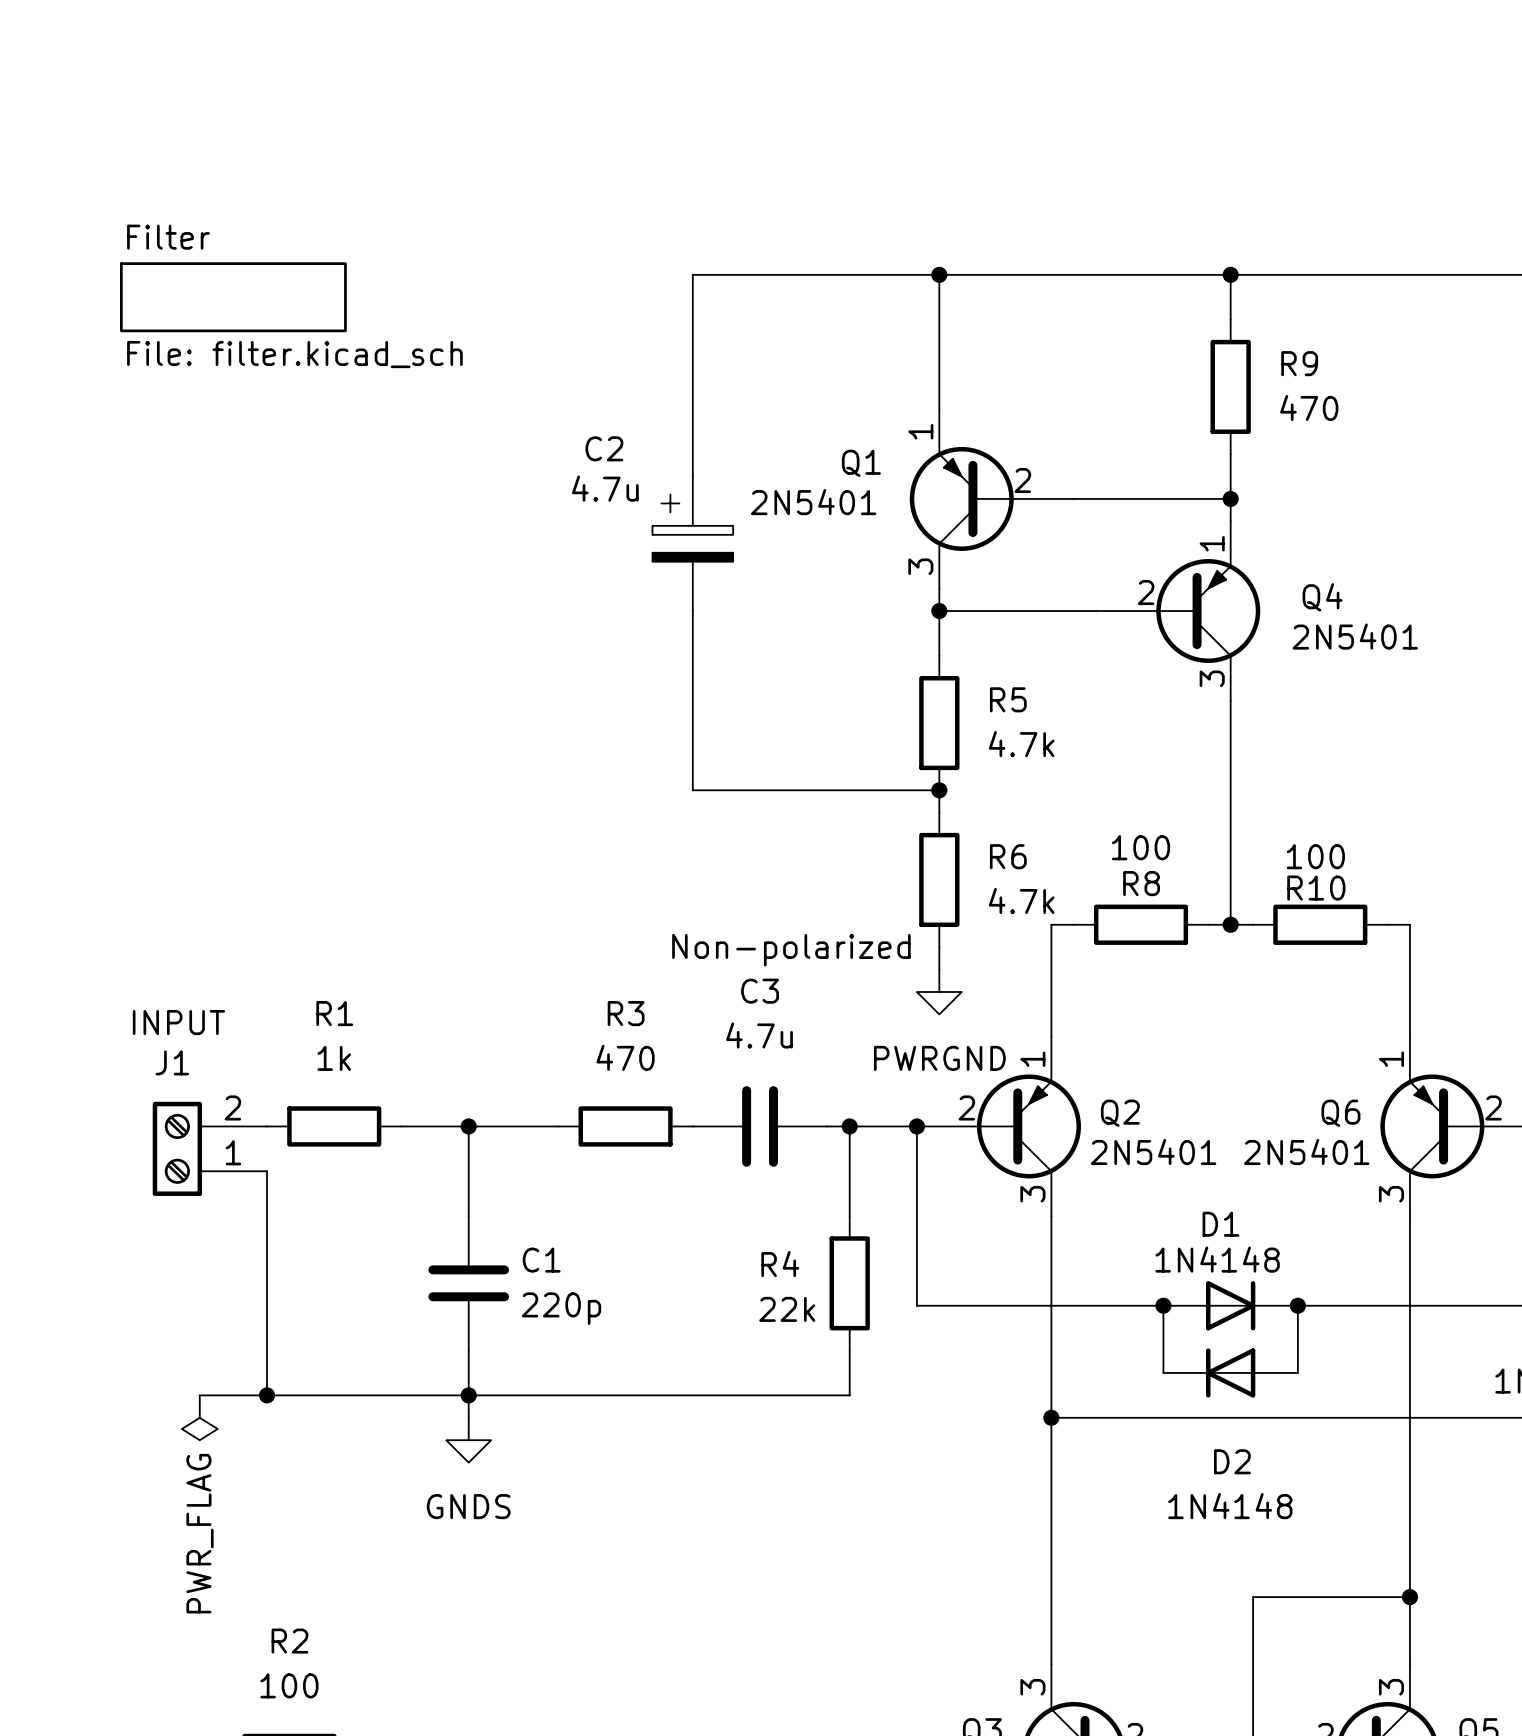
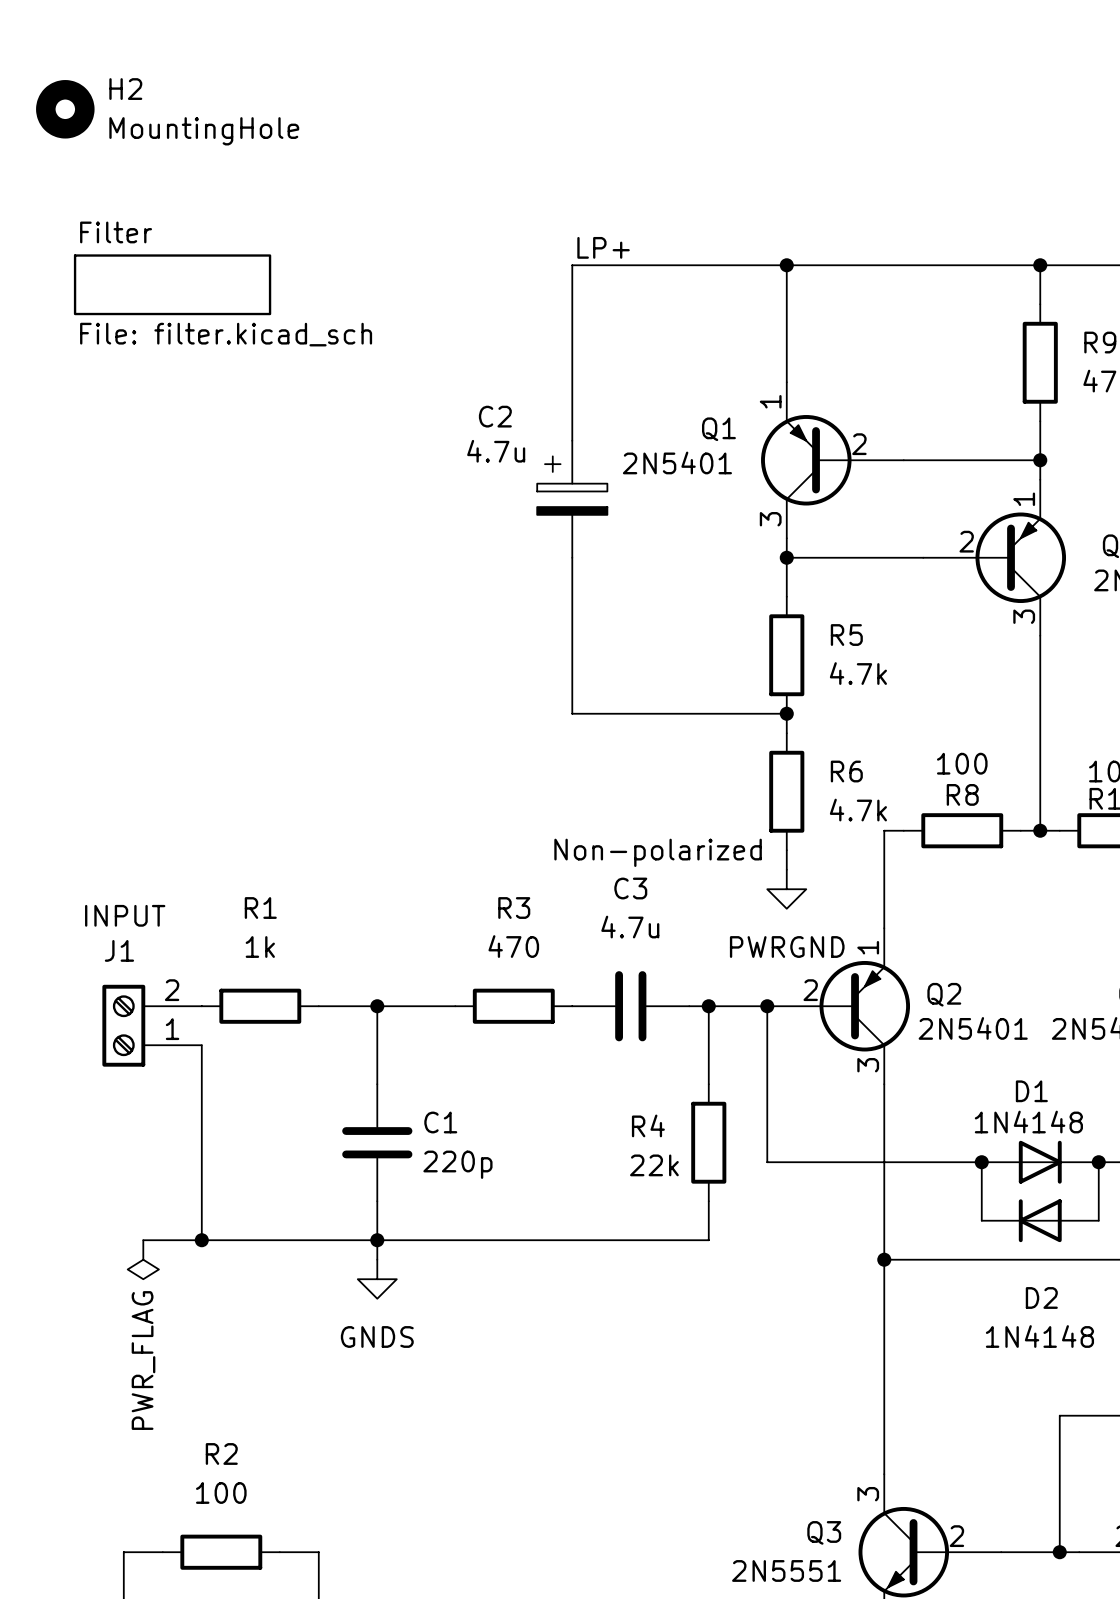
H2: none -> MountingHole (65, 109)
label: none -> LP+ (603, 247)

